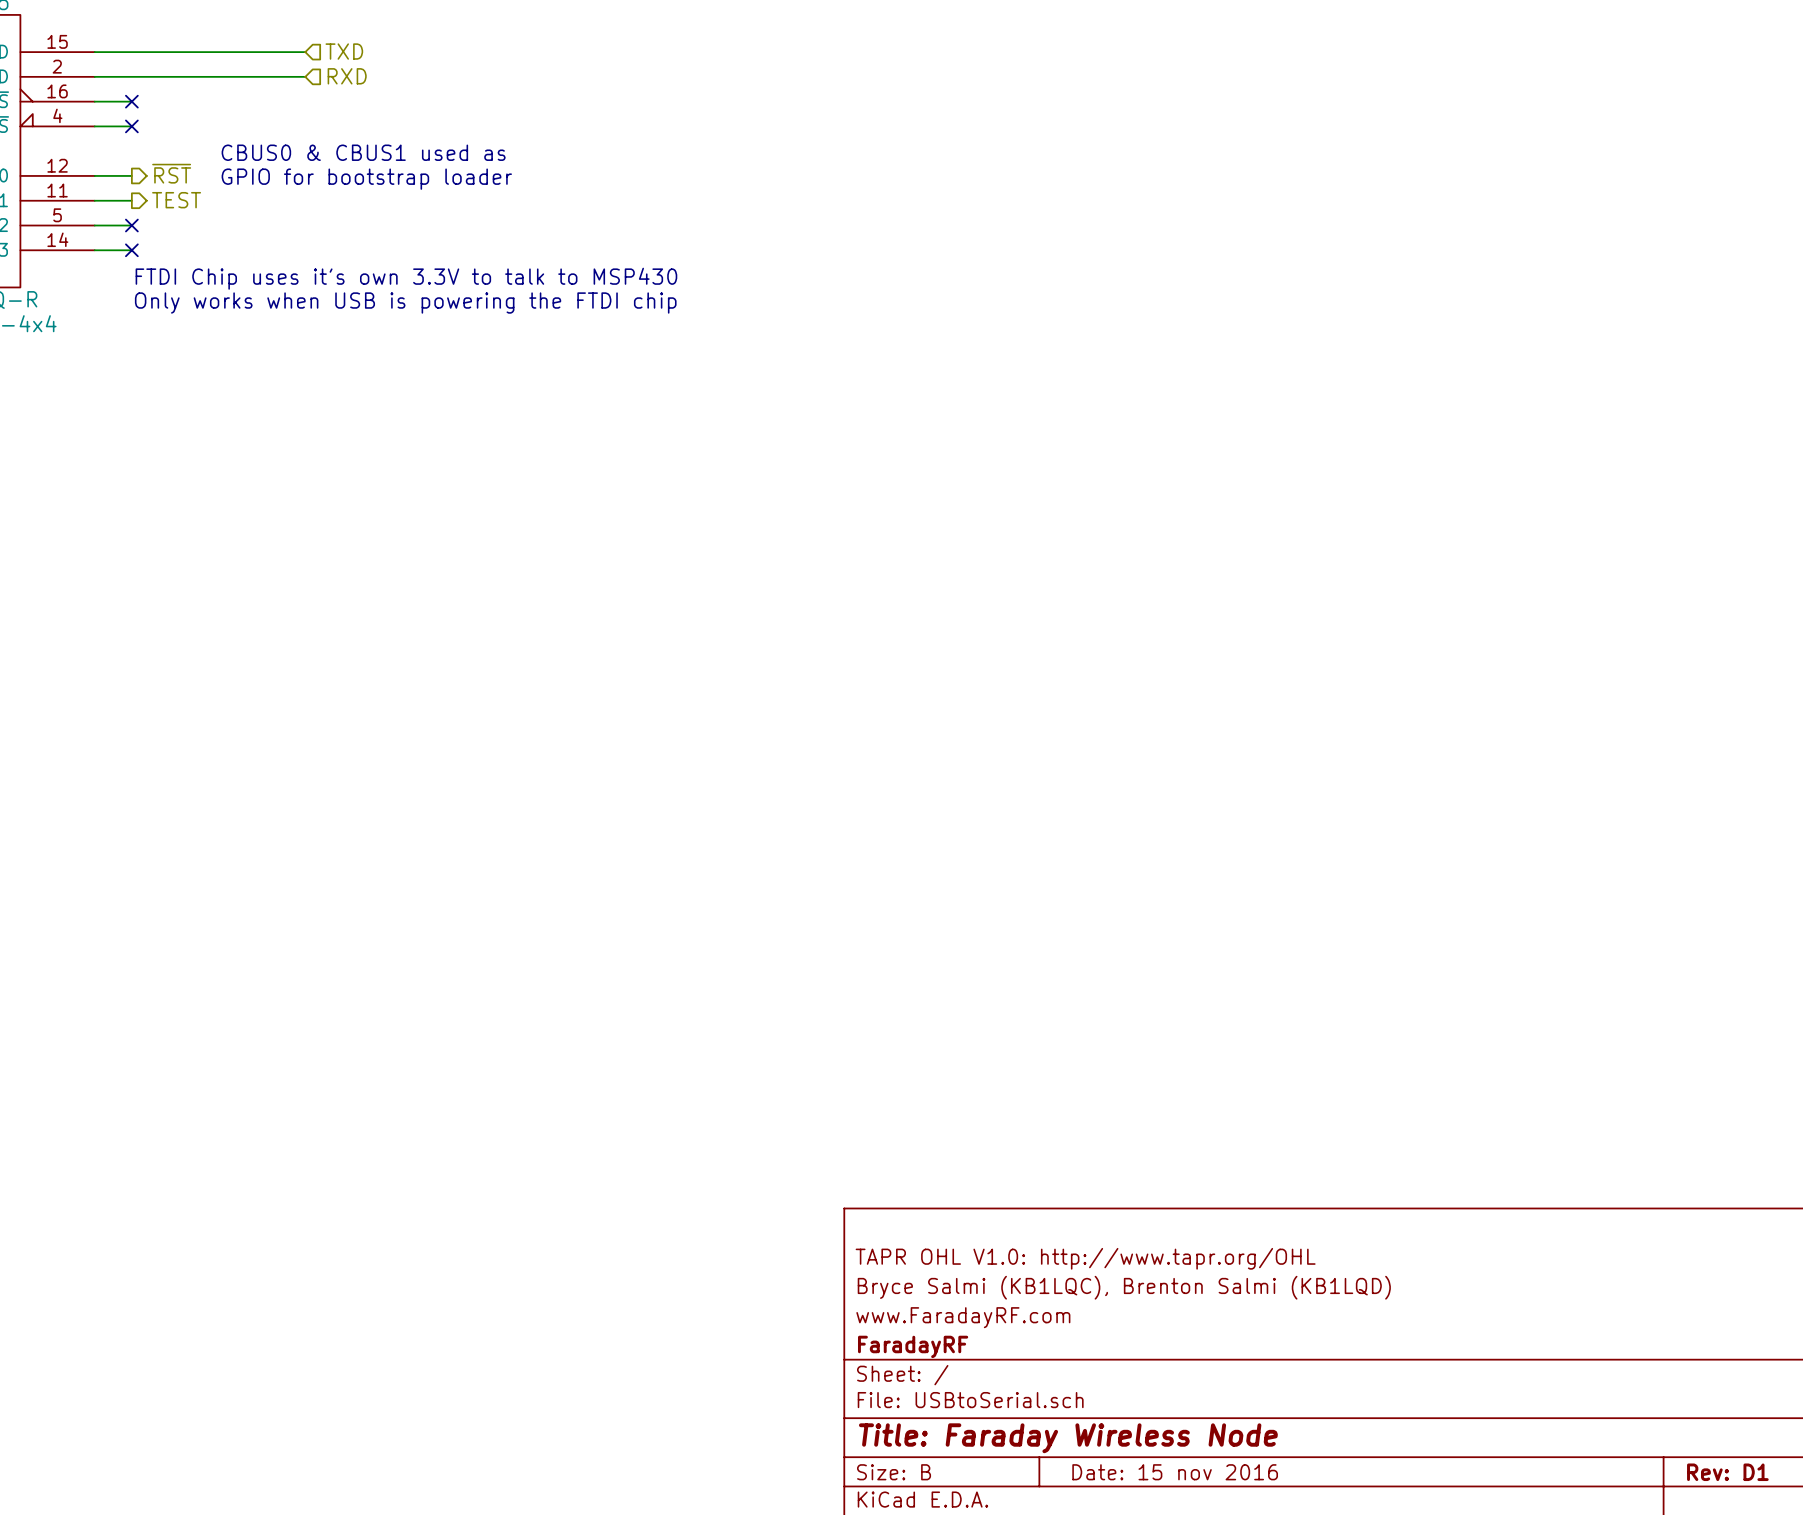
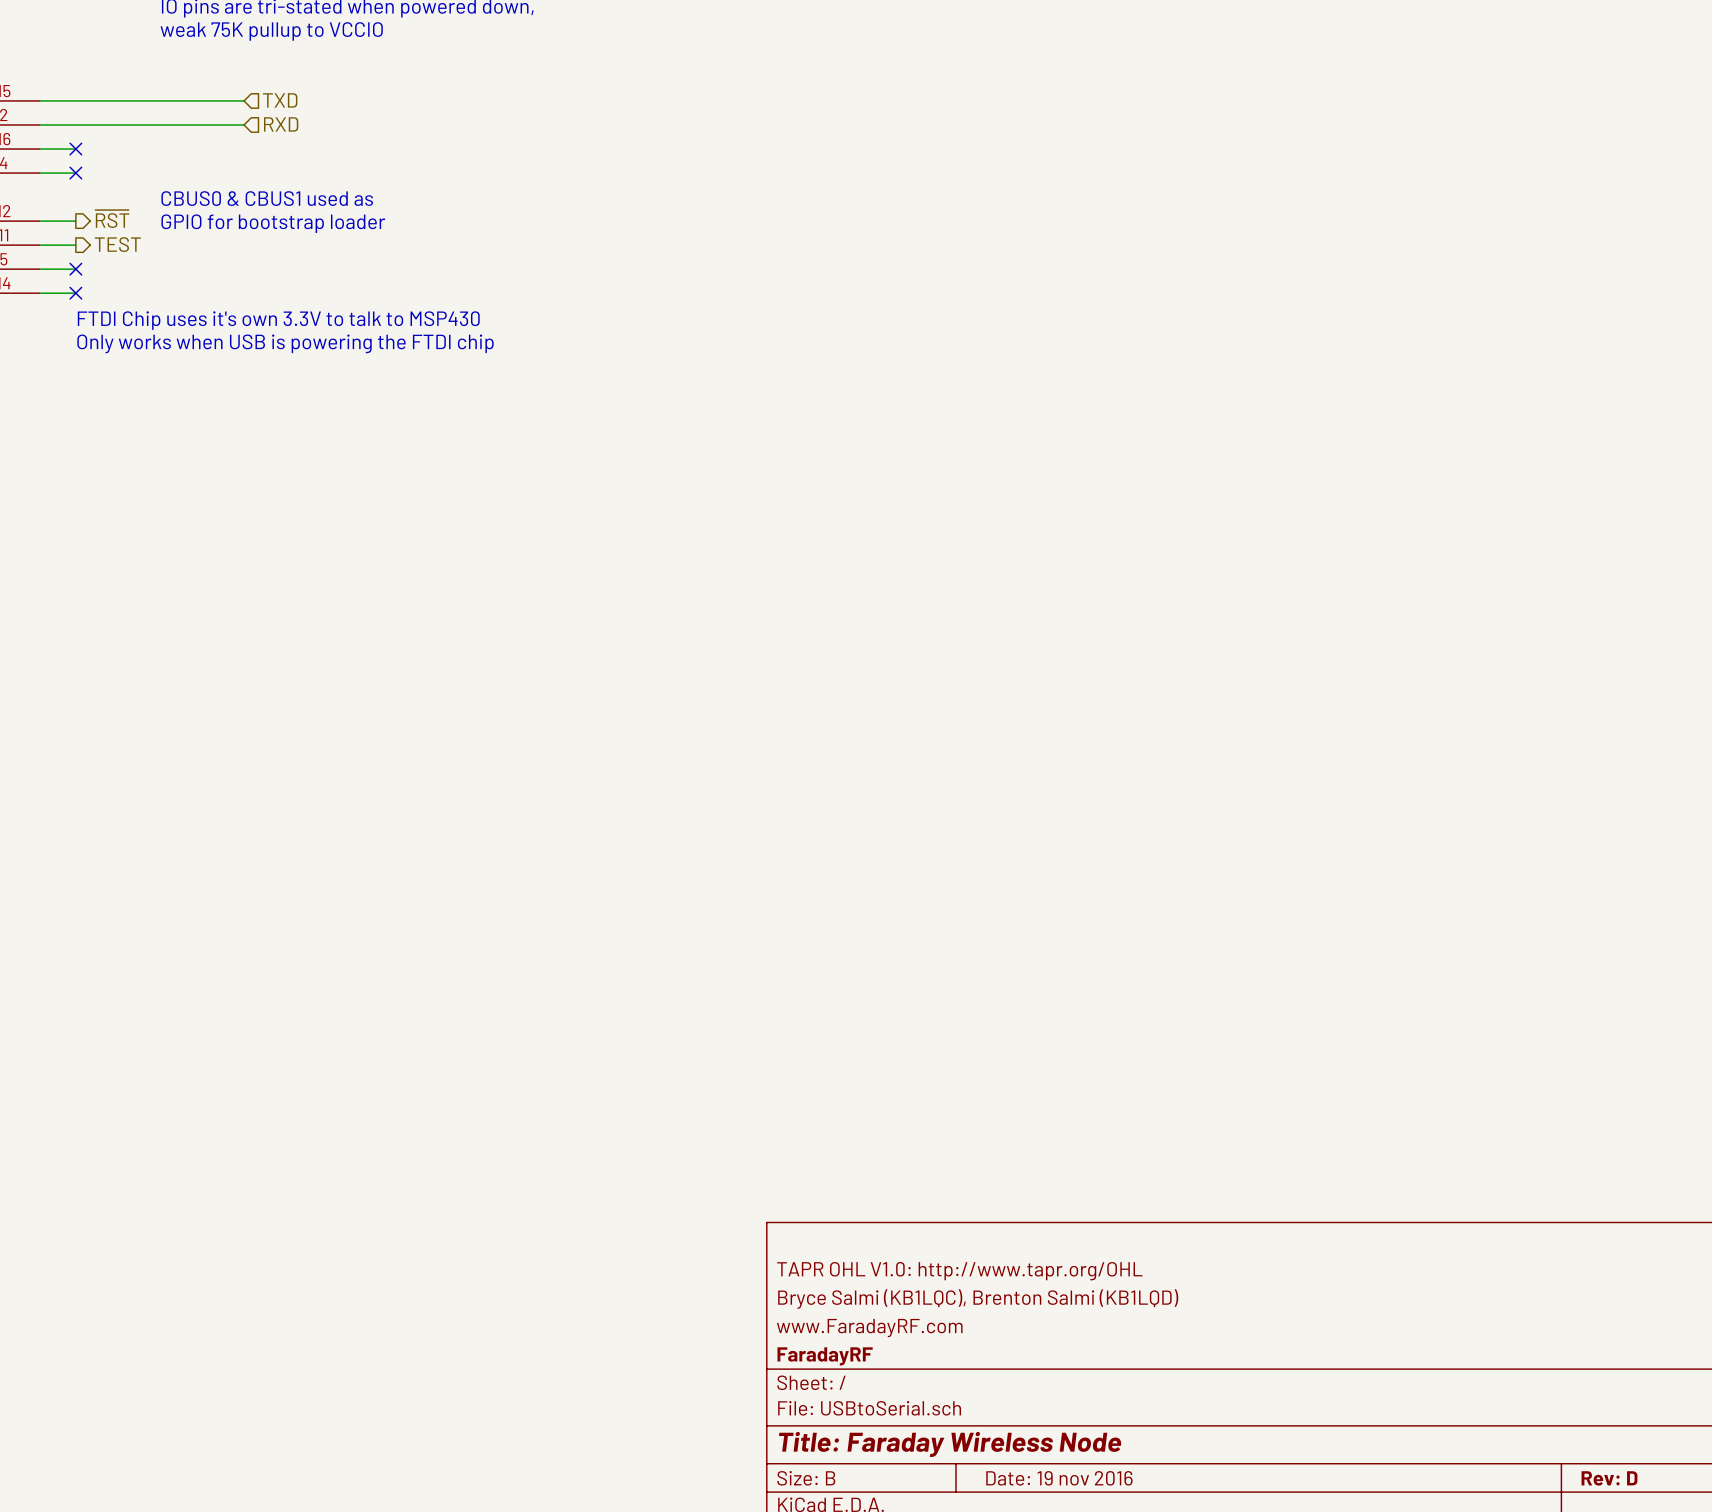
title block: Date: 15 nov 2016 (1175, 1472) -> Date: 19 nov 2016 (1059, 1478)
title block: Rev: D1 (1727, 1472) -> Rev: D (1609, 1478)

